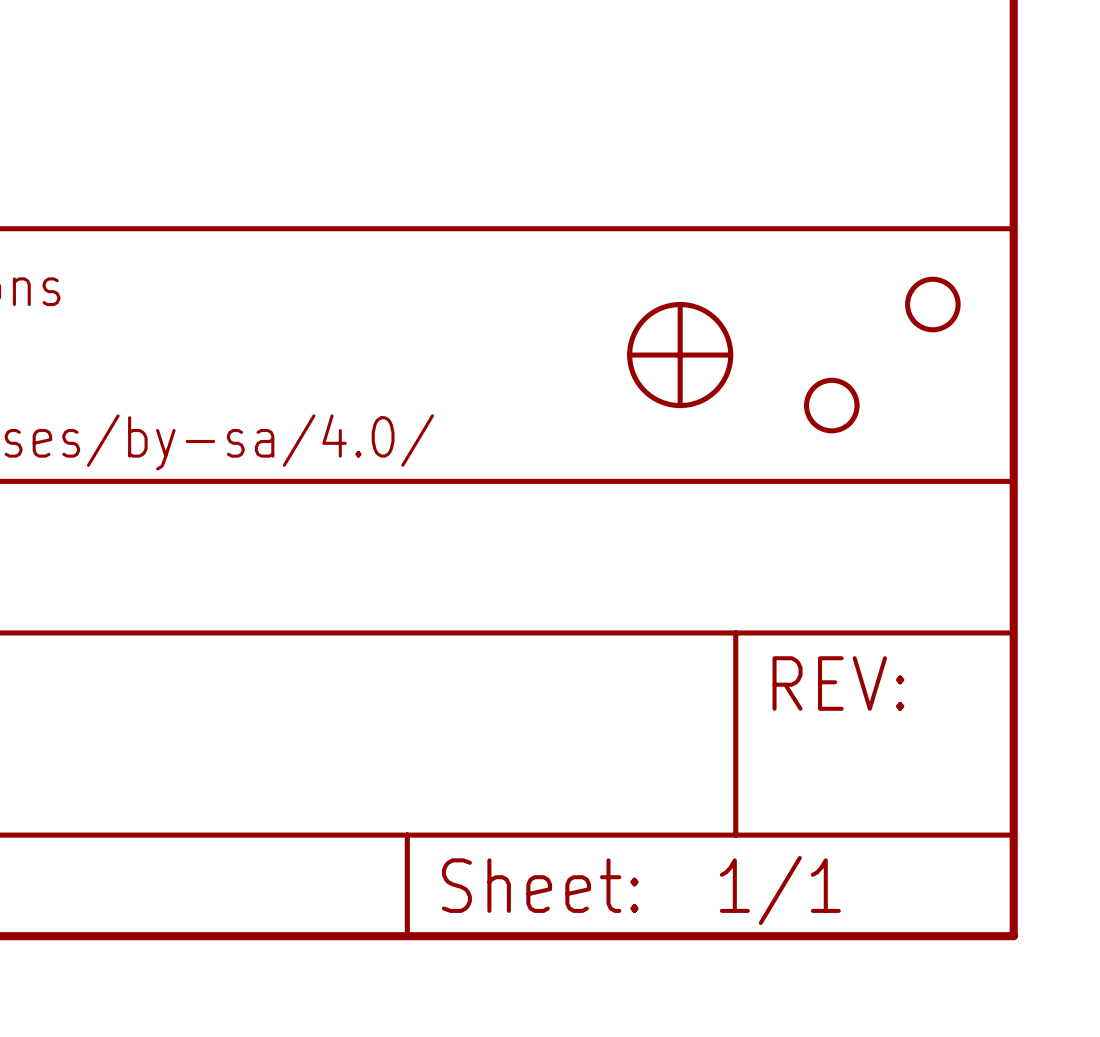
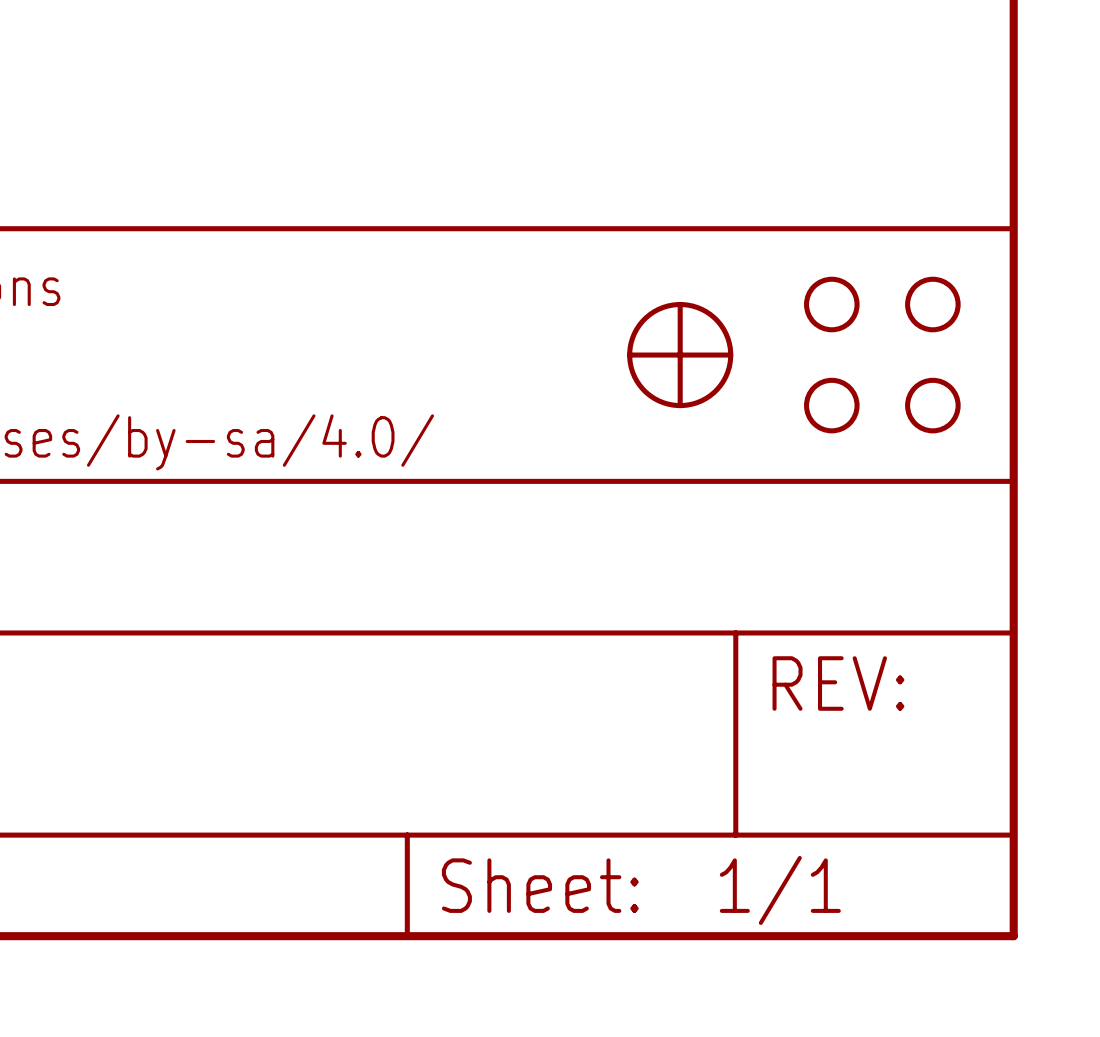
part: none -> (831, 304)
part: none -> (932, 405)

